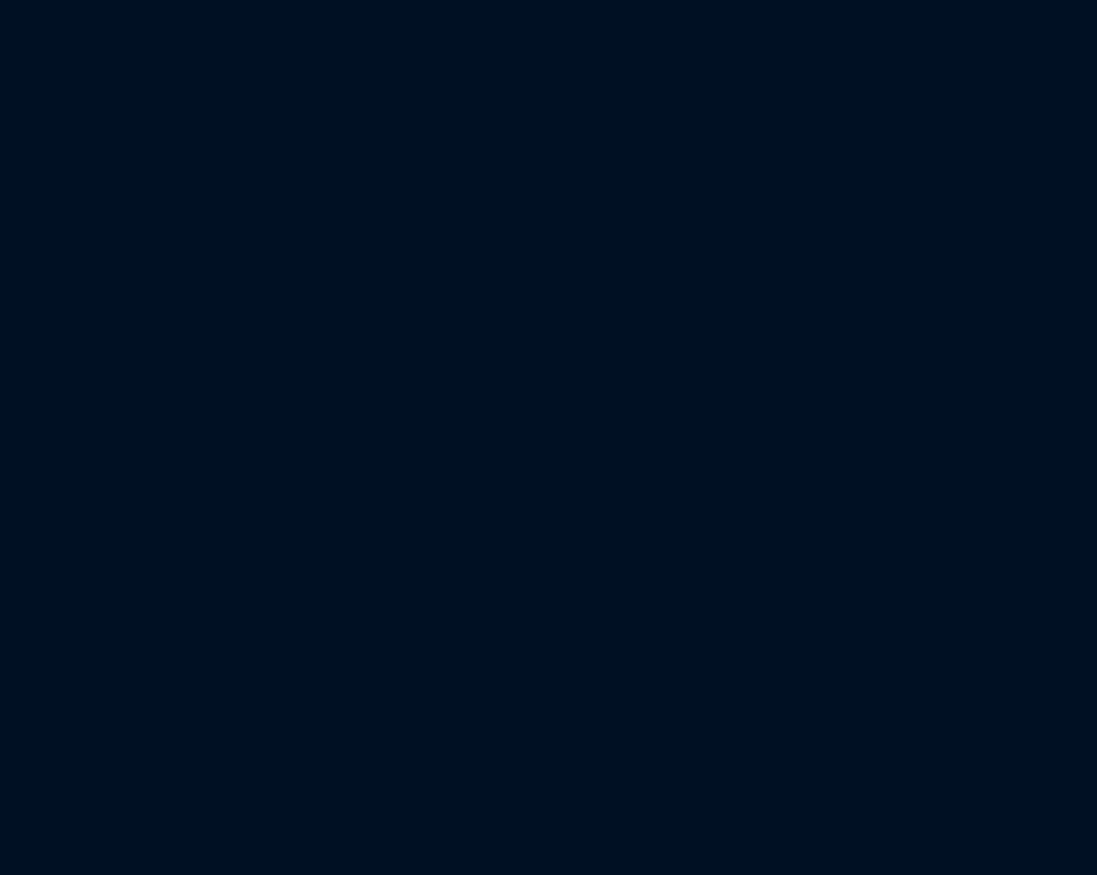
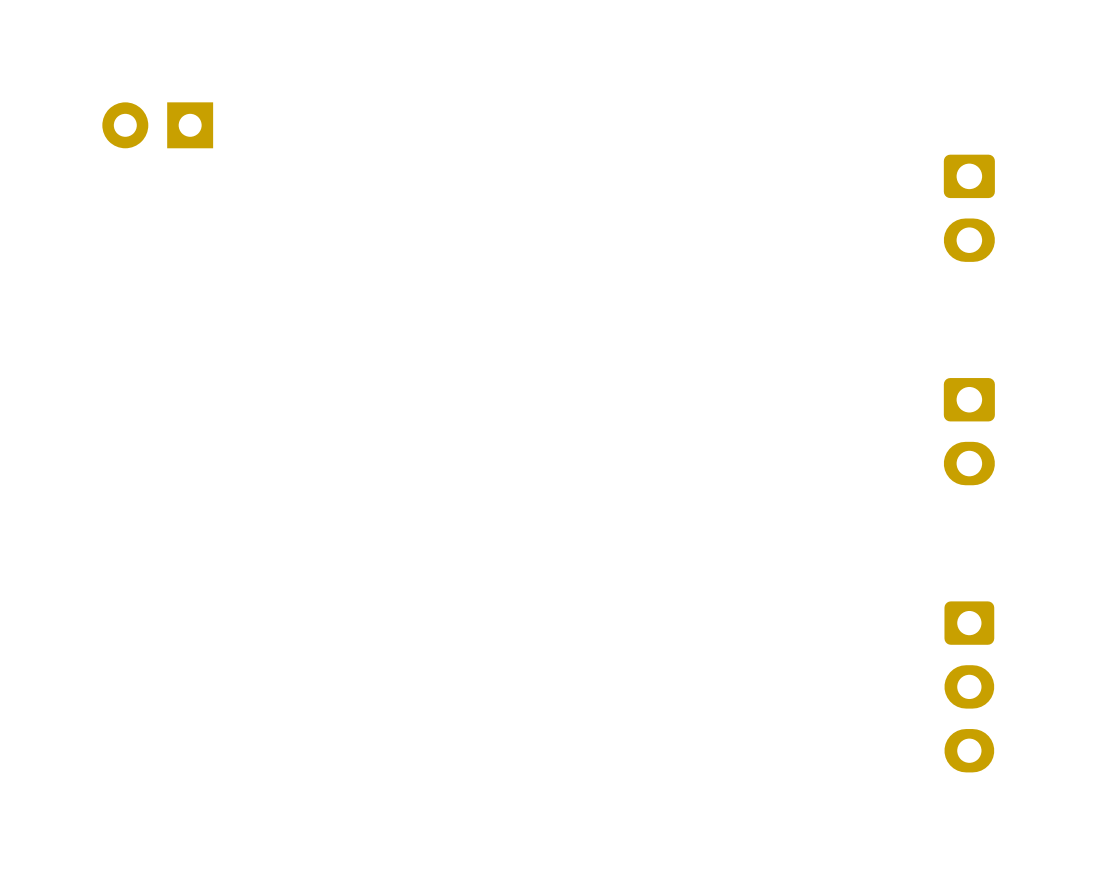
part: none -> (157, 125)
part: none -> (969, 208)
part: none -> (969, 431)
part: none -> (969, 686)

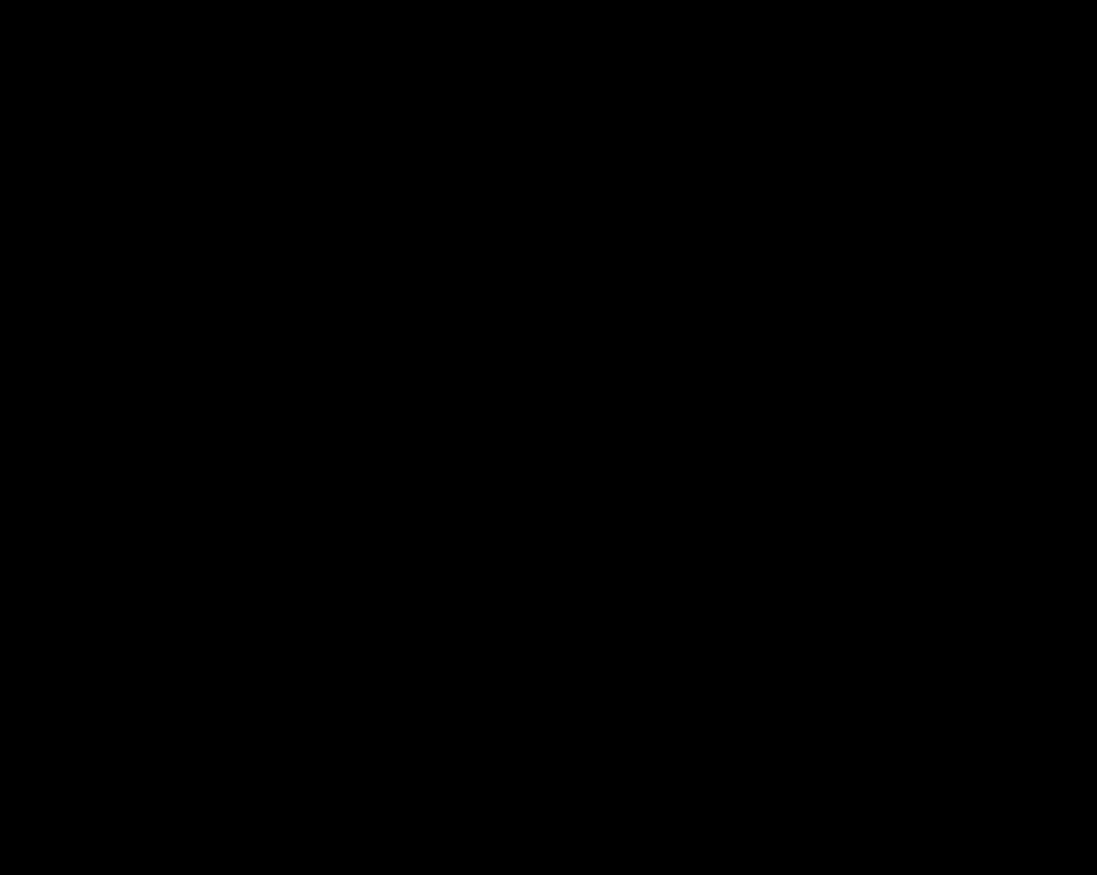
part: (157, 125) -> none
part: (969, 208) -> none
part: (969, 431) -> none
part: (969, 686) -> none

